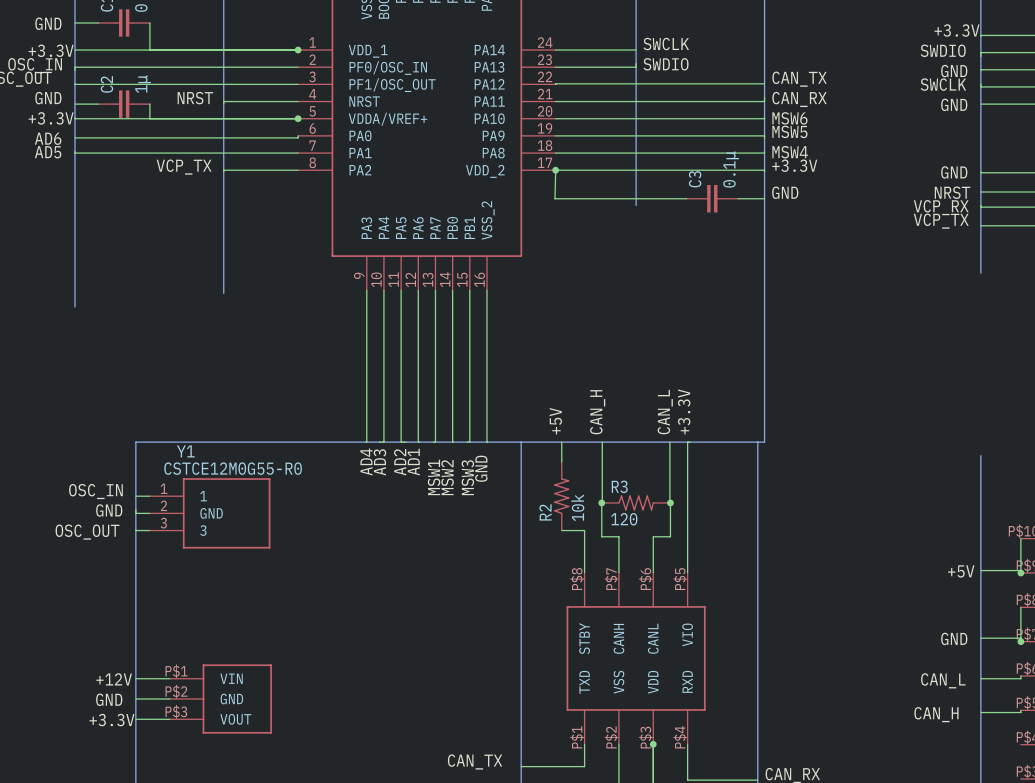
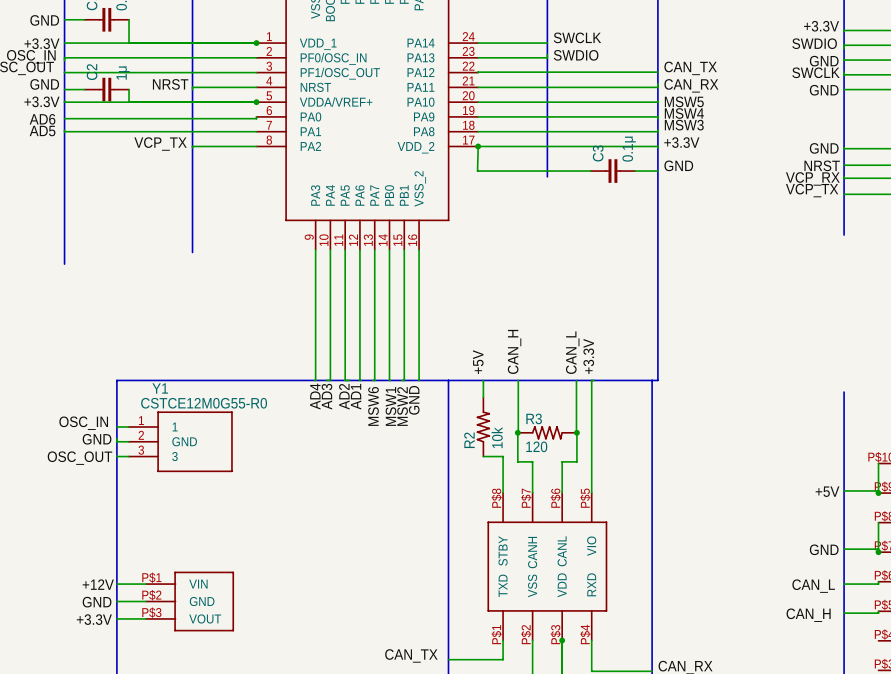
label: MSW6 (789, 118) -> MSW5 (684, 101)
label: MSW5 (789, 131) -> MSW4 (684, 113)
label: MSW4 (790, 152) -> MSW3 (684, 125)
label: MSW1 (434, 477) -> MSW6 (373, 406)
label: MSW2 (447, 477) -> MSW1 (390, 406)
label: MSW3 (467, 477) -> MSW2 (402, 406)

